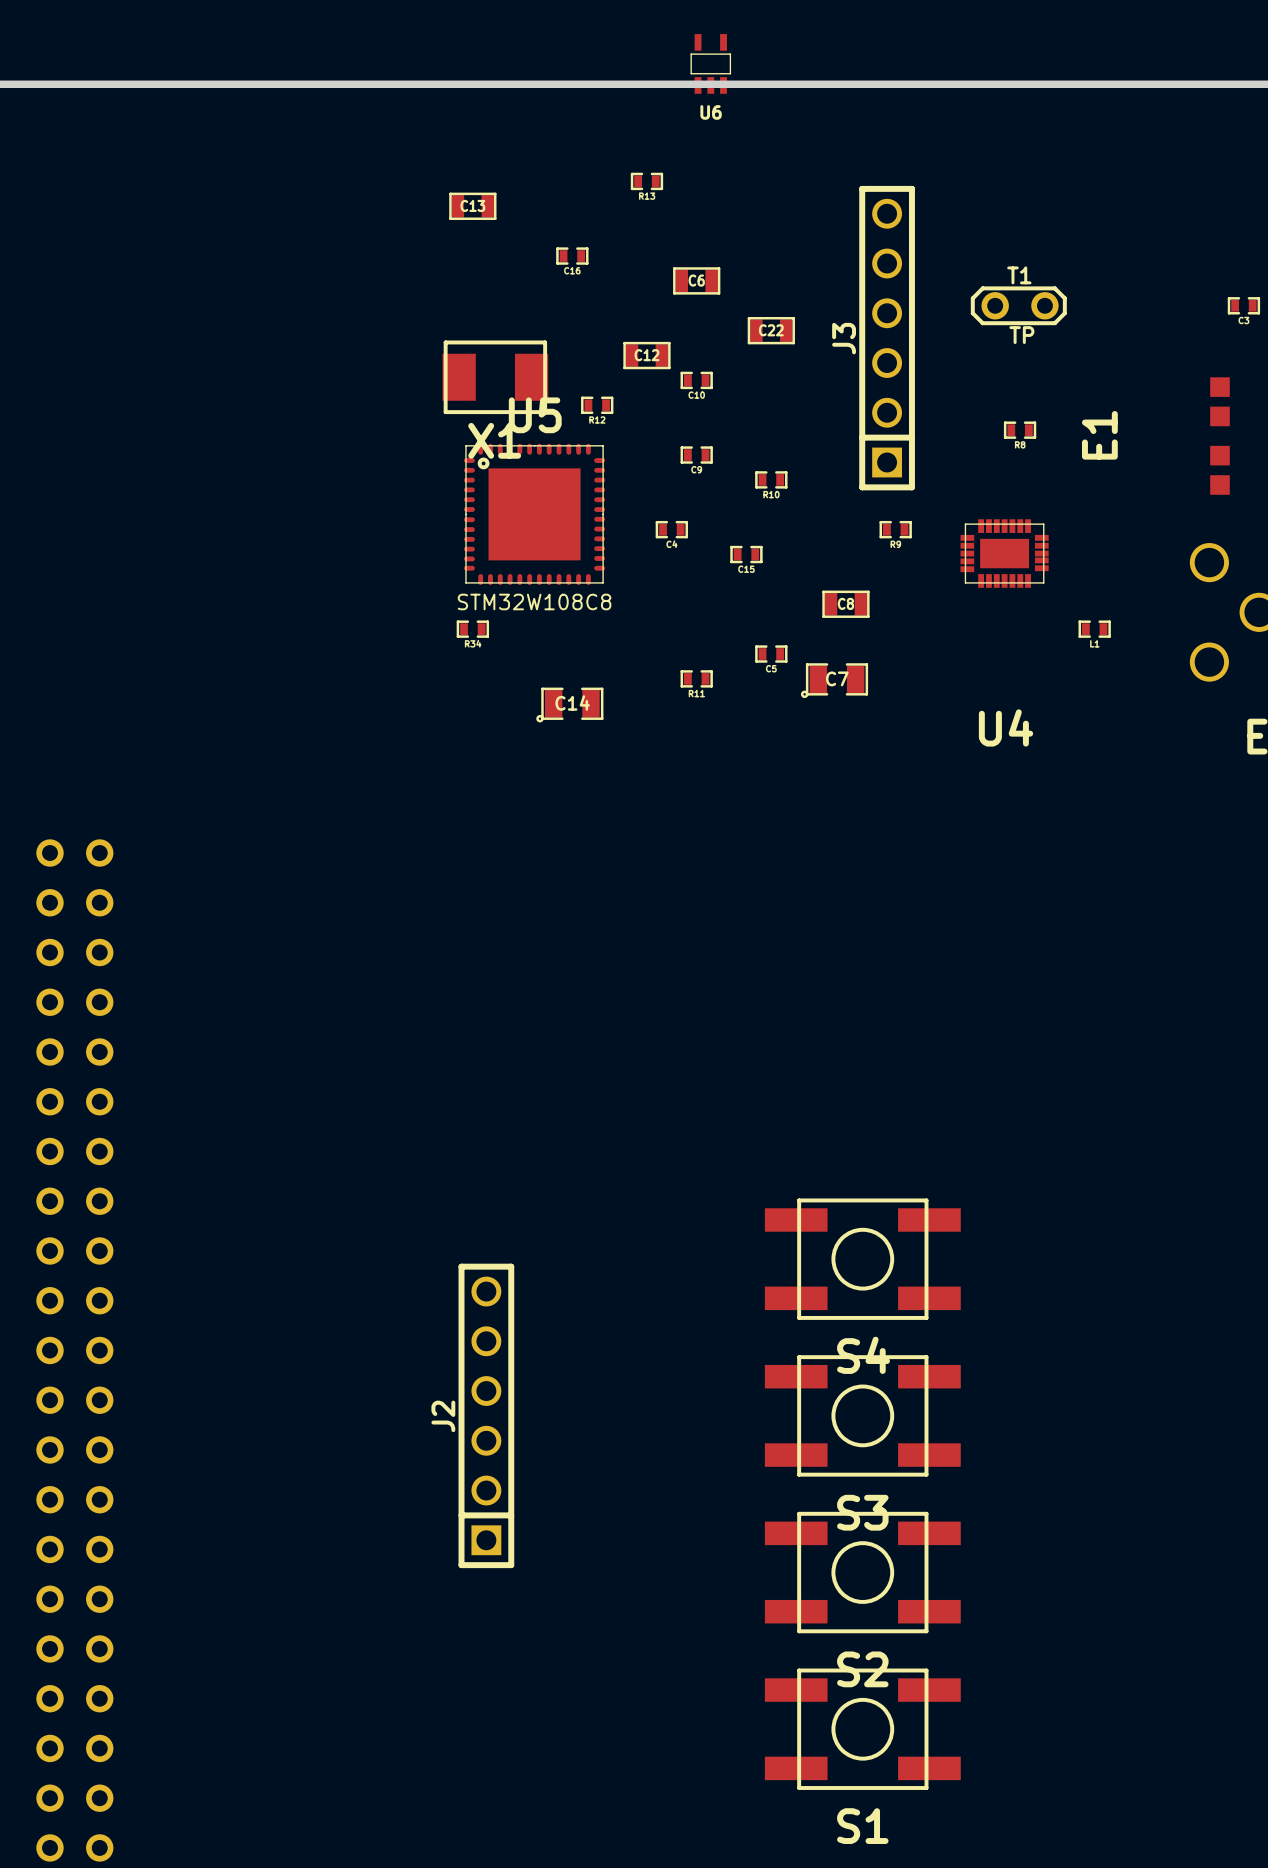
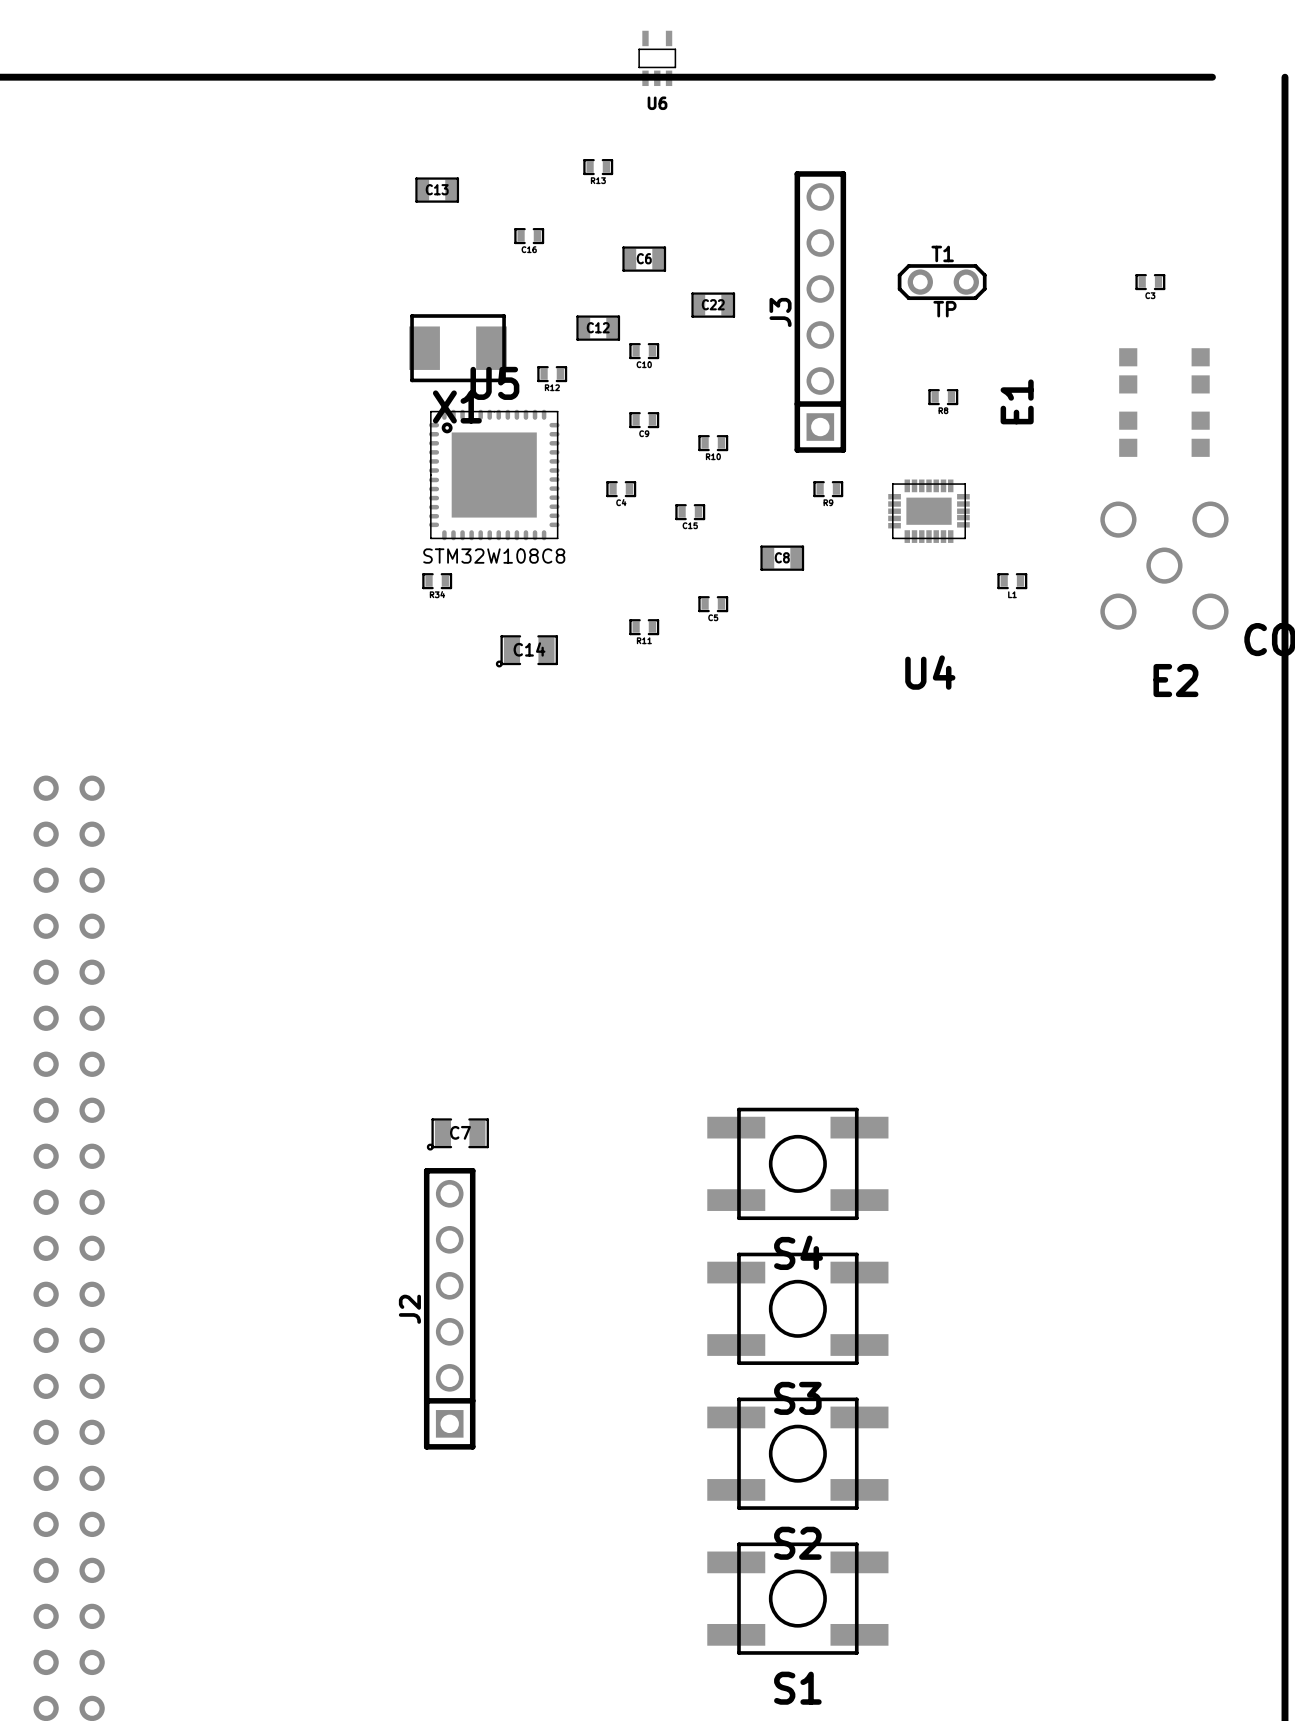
C7 position: (834, 680) -> (457, 1134)

